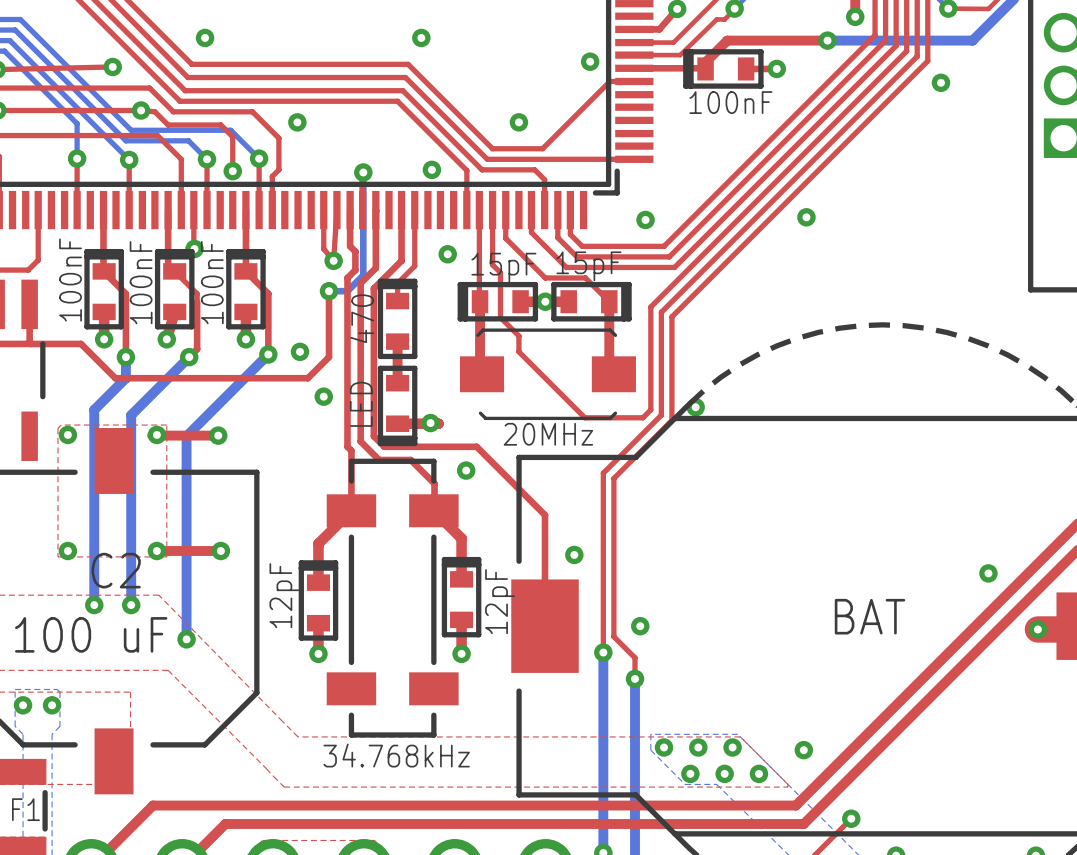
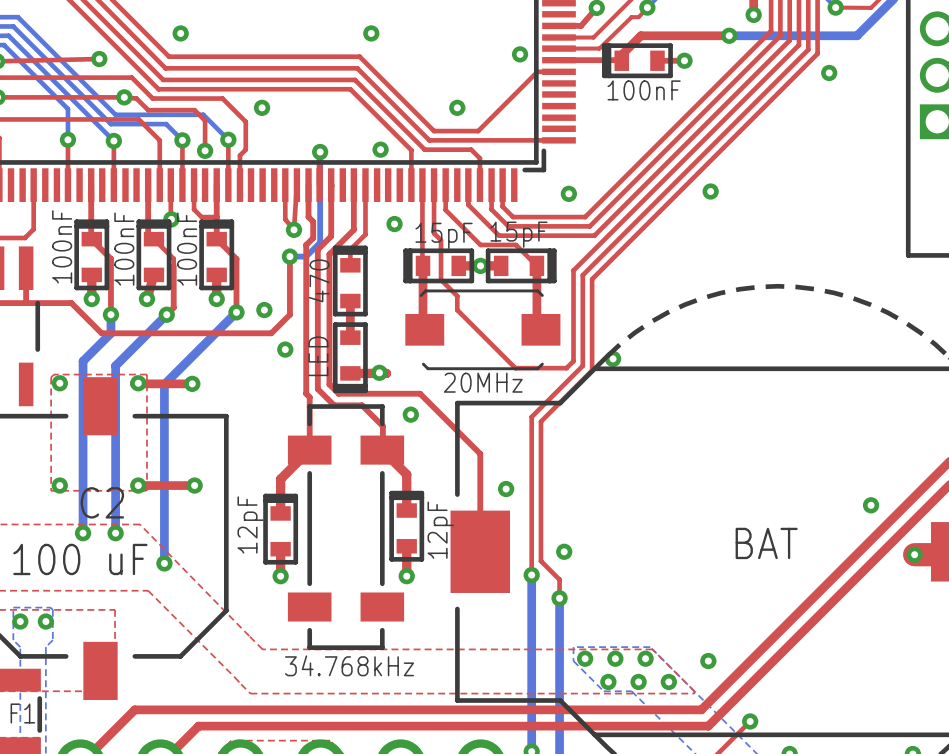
top track: none -> (194, 185) (194, 209) (201, 217) (216, 217)

